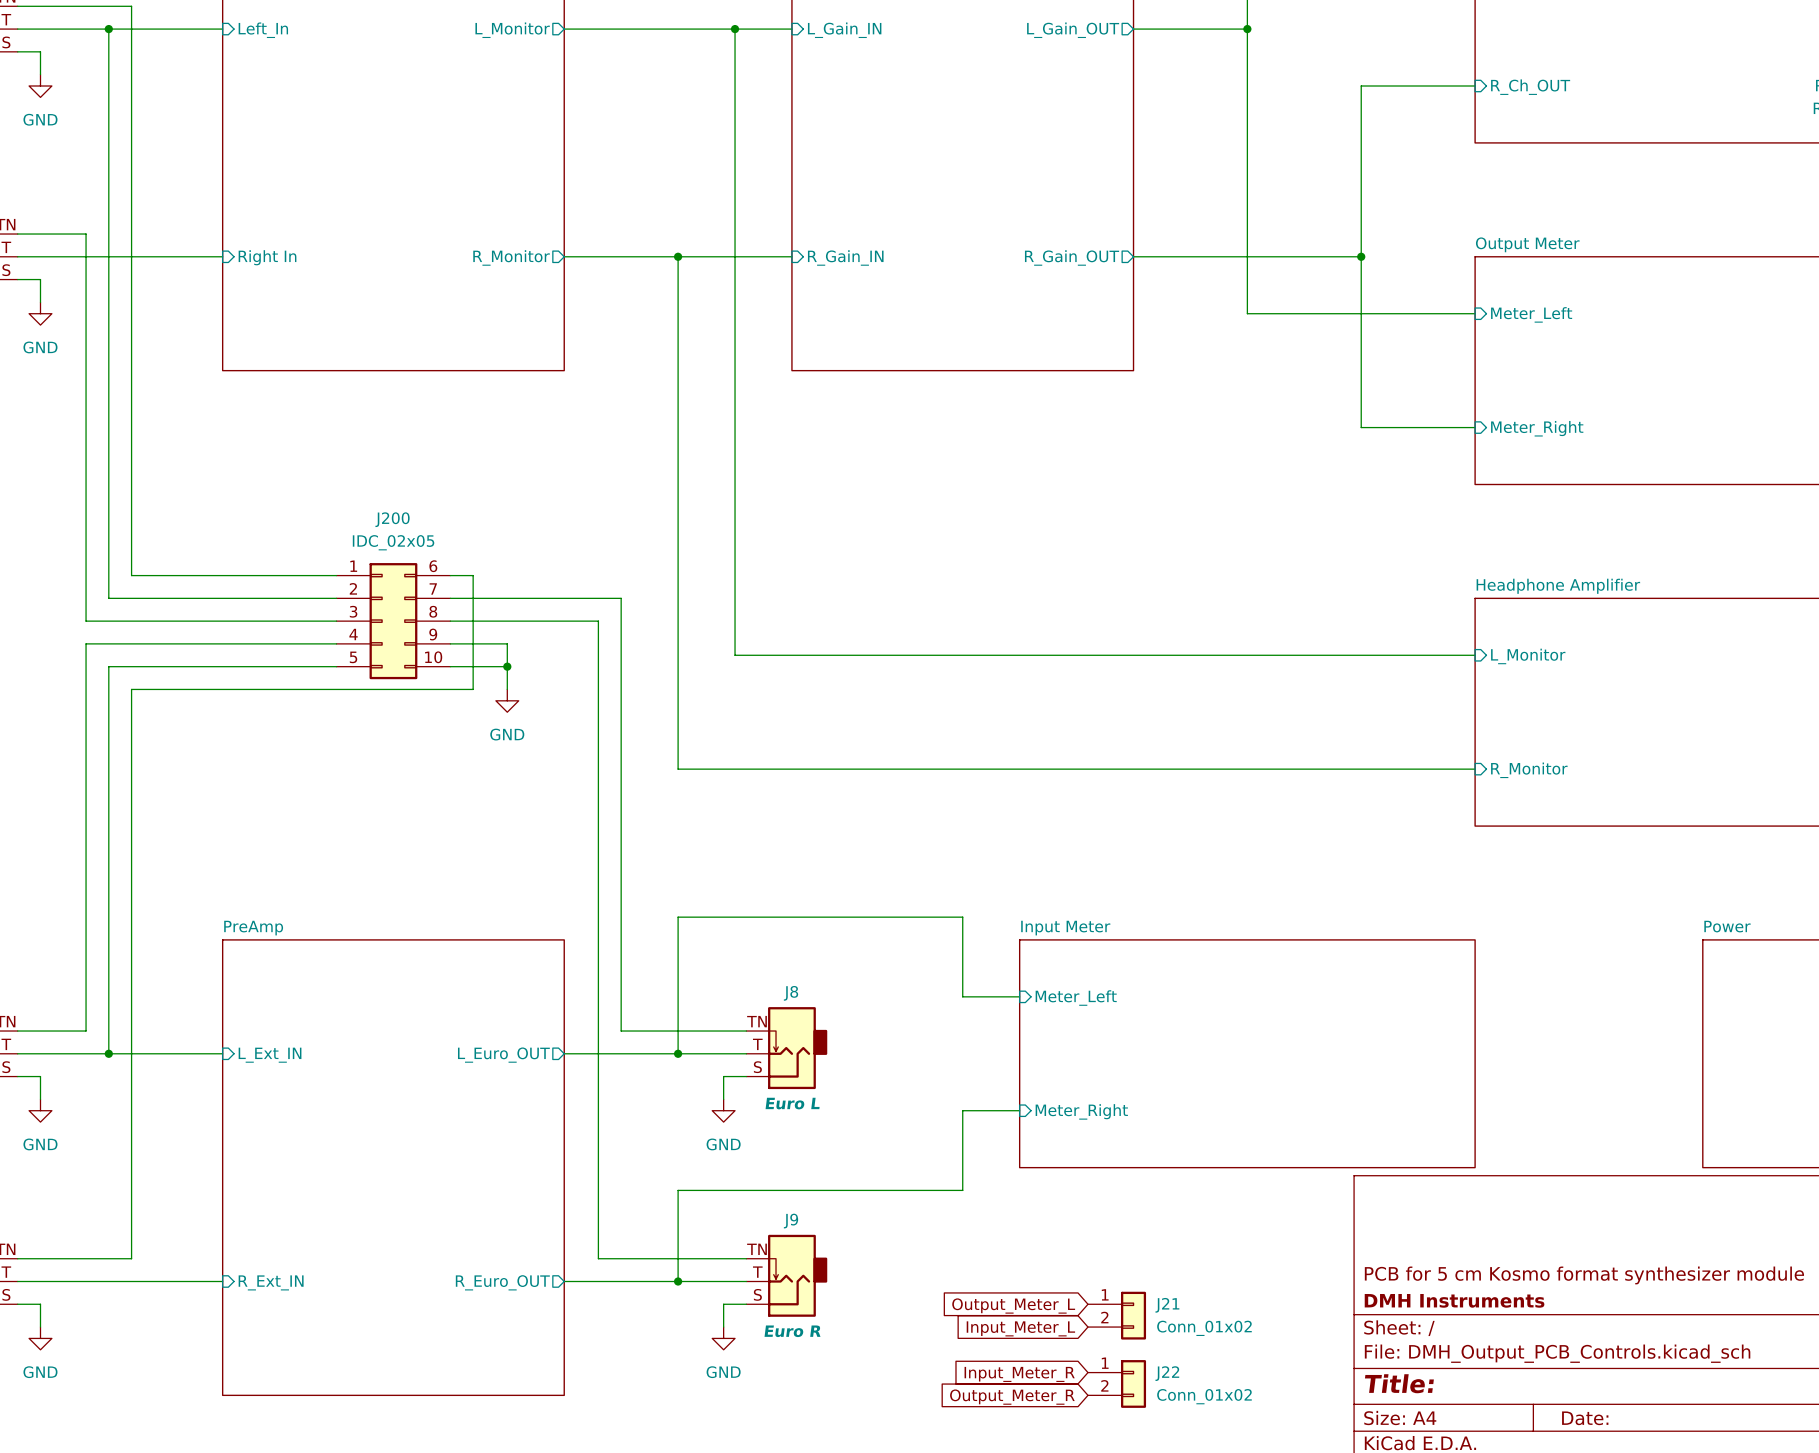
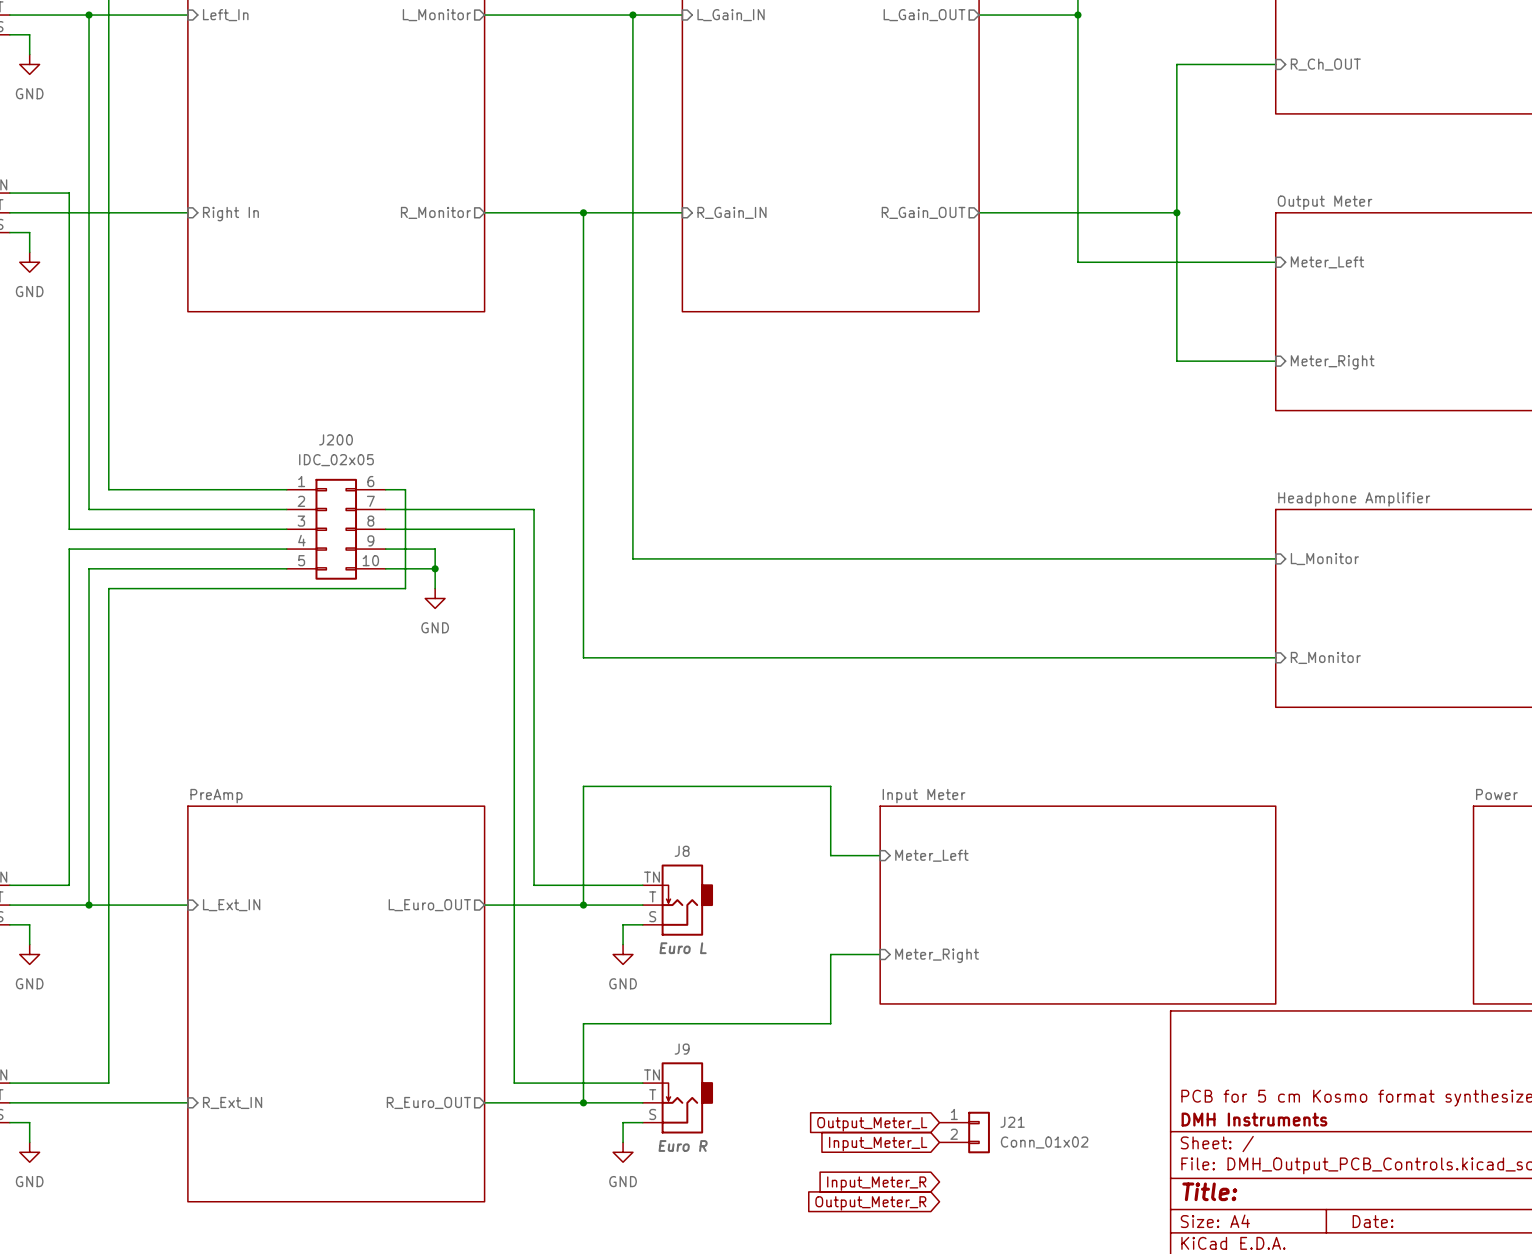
J22: Conn_01x02 (1117, 1383) -> none

